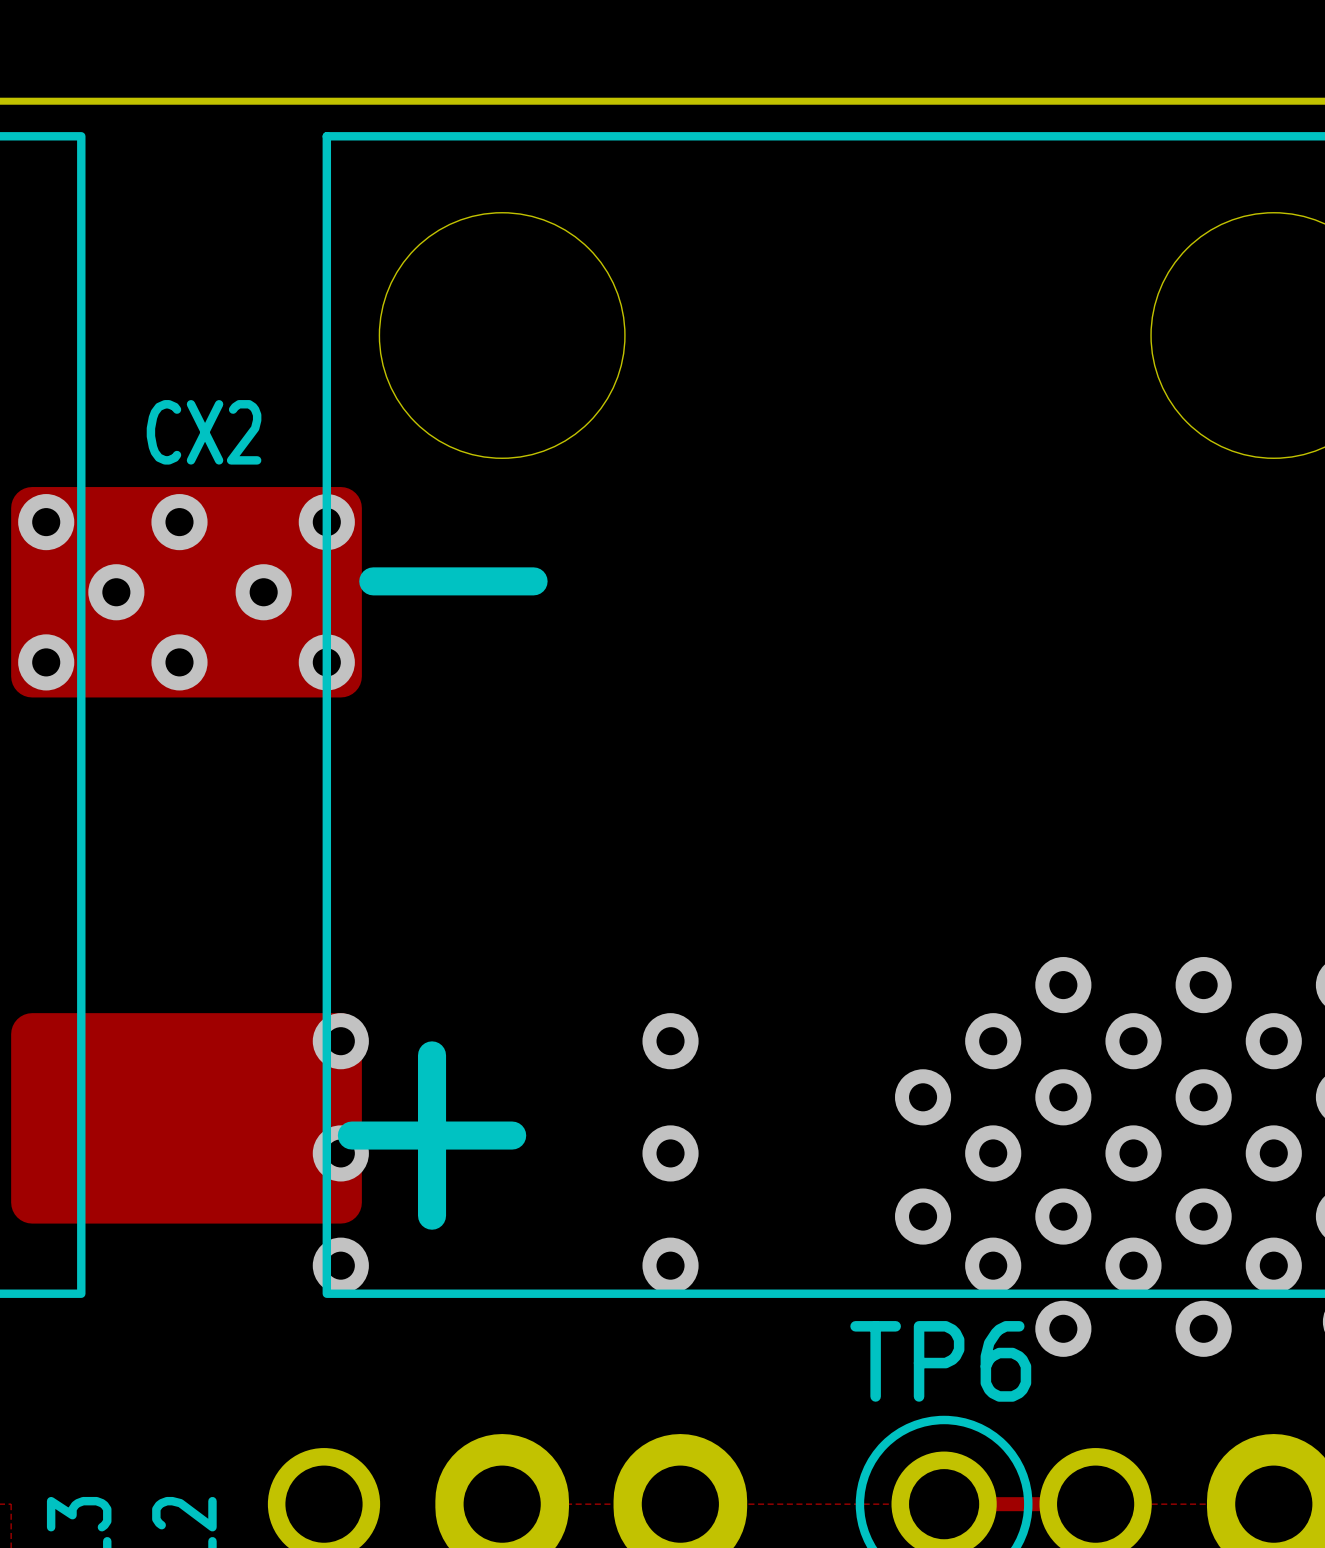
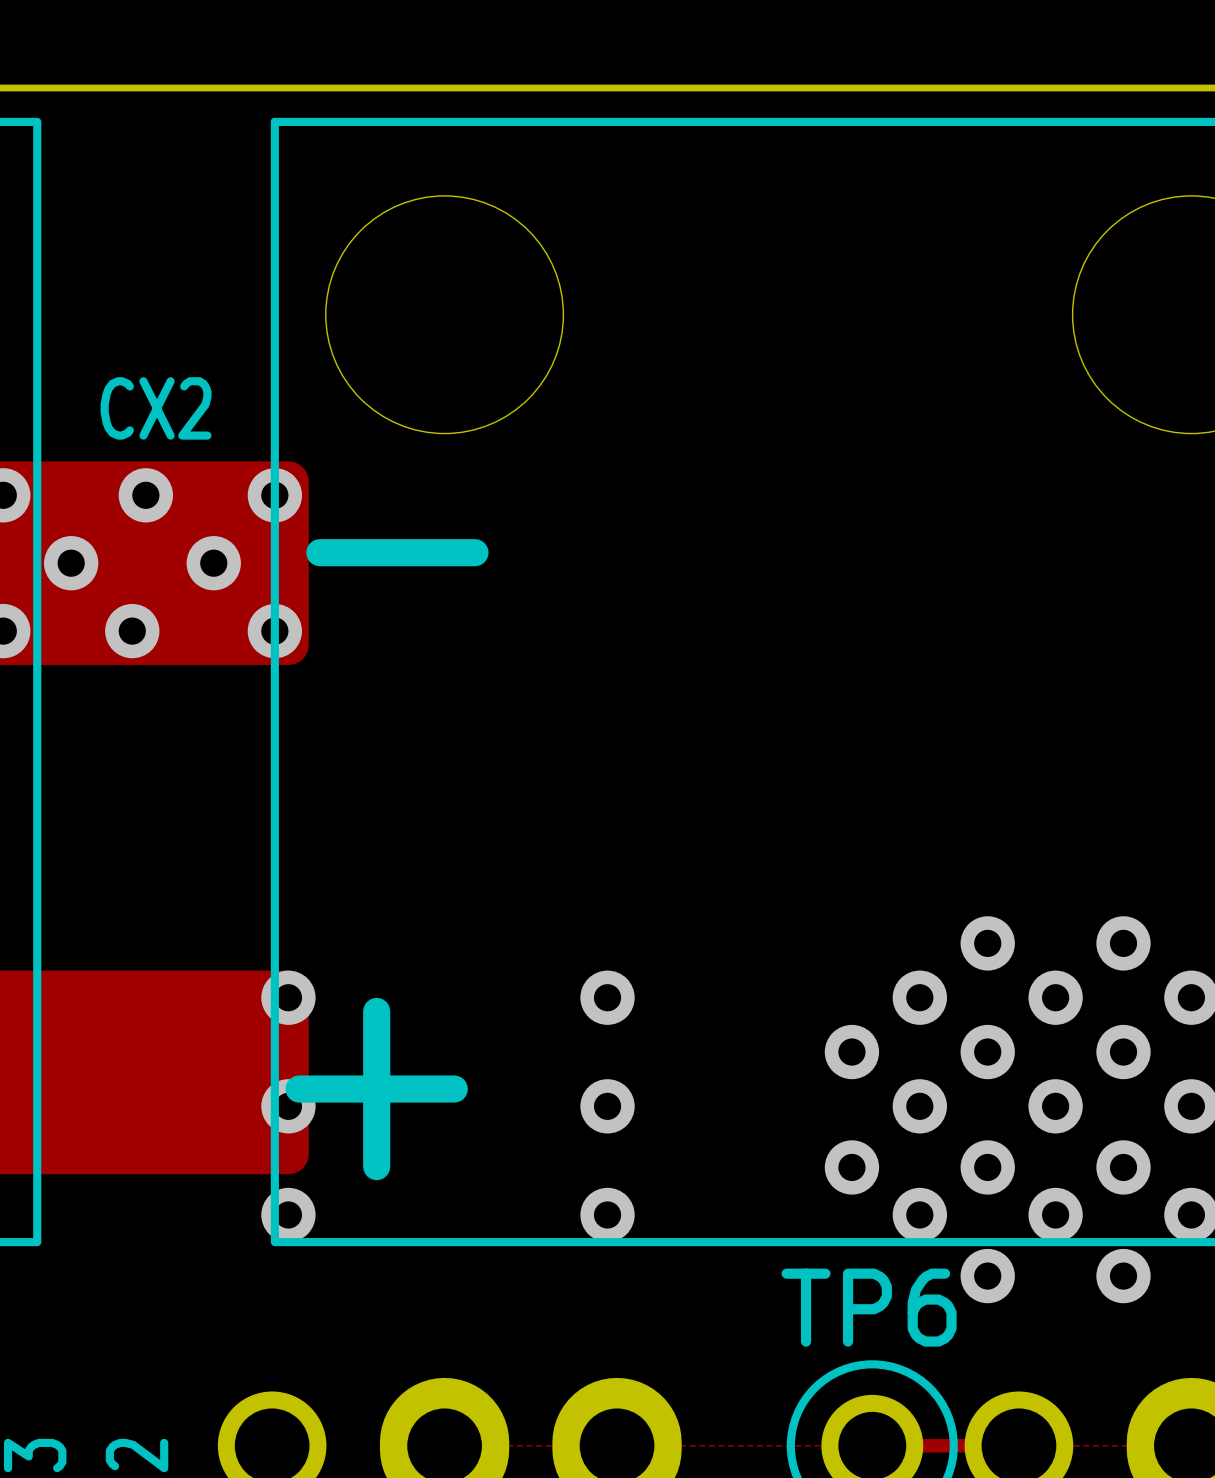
via position: (179, 522) -> (145, 495)

